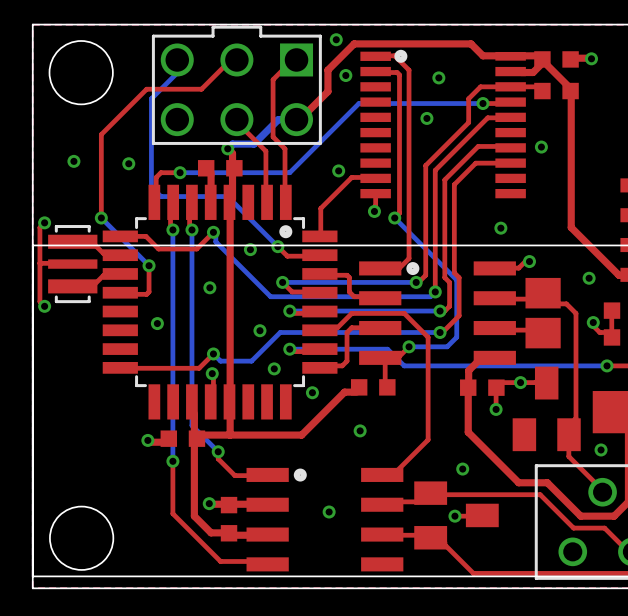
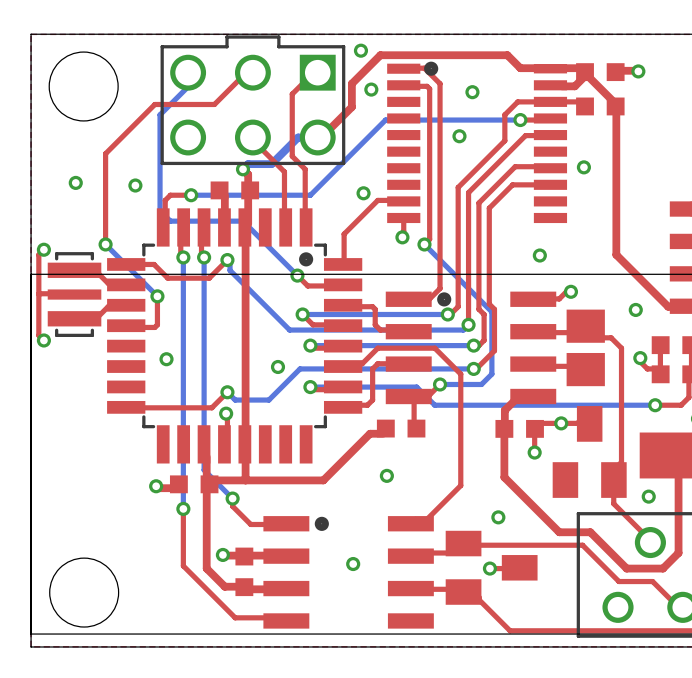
via: (250, 249) -> none
via: (209, 287) -> none
via: (274, 368) -> none
via: (312, 392) -> none

